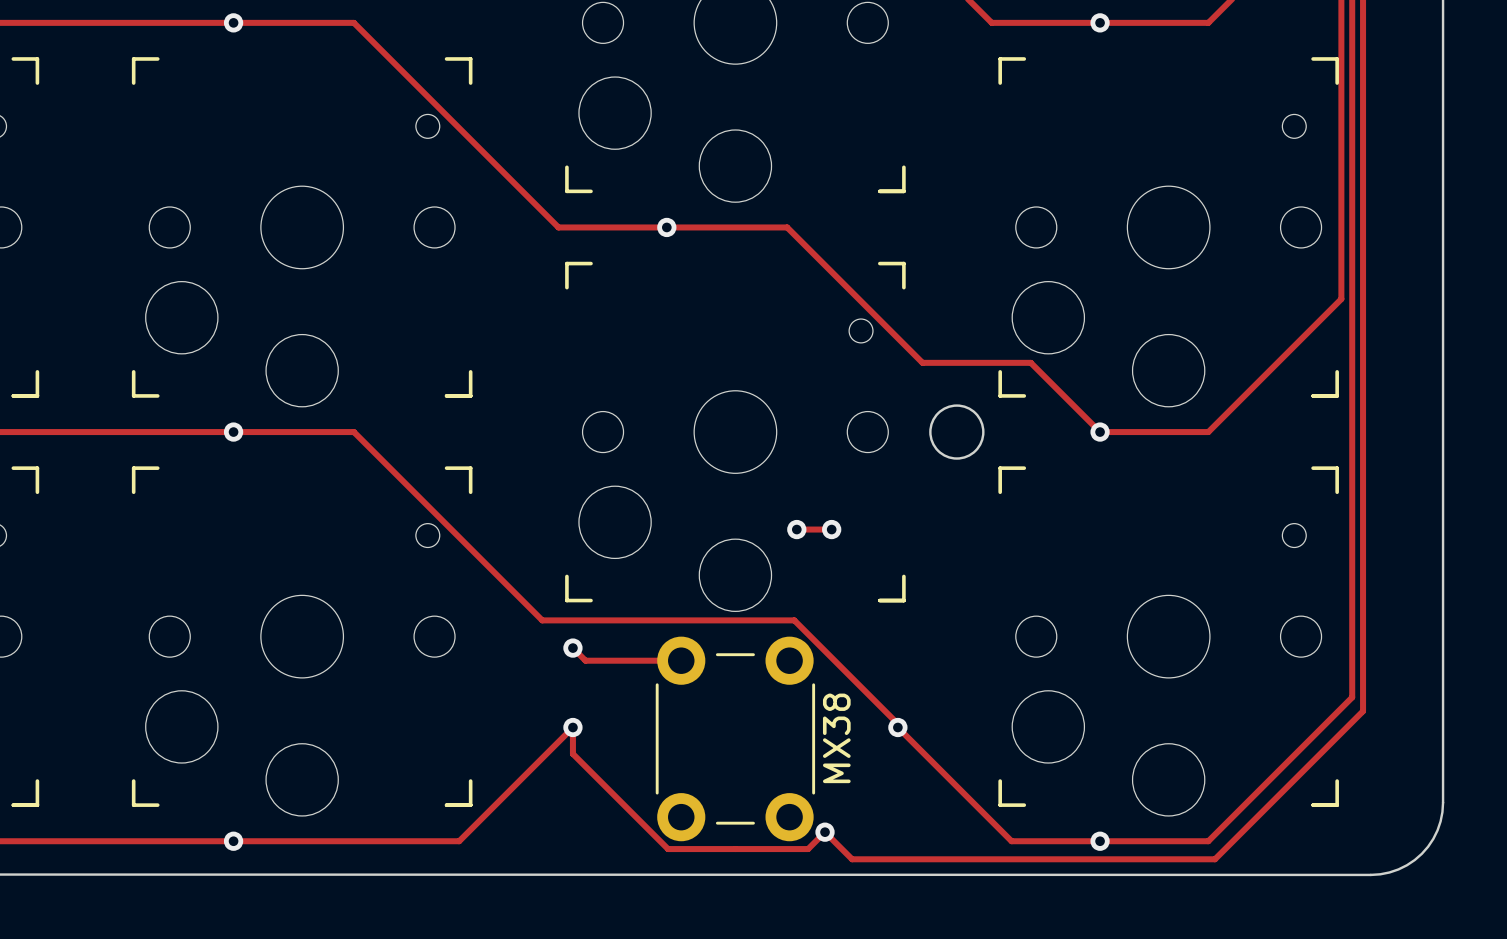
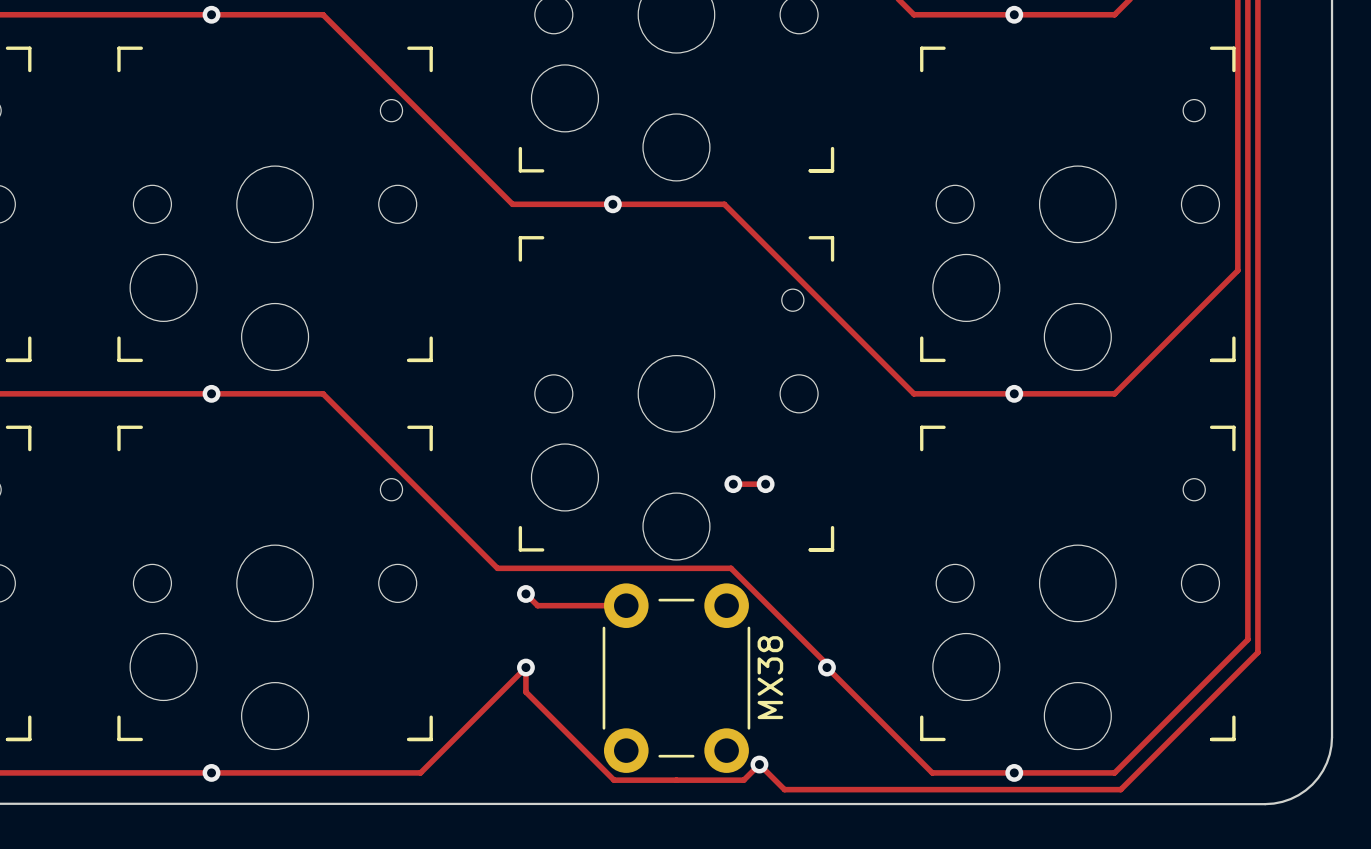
track: (922, 362) (1030, 362) (1100, 432) -> (849, 329) (913, 393) (1014, 393)
round board edge: [929, 404, 985, 460] -> none

